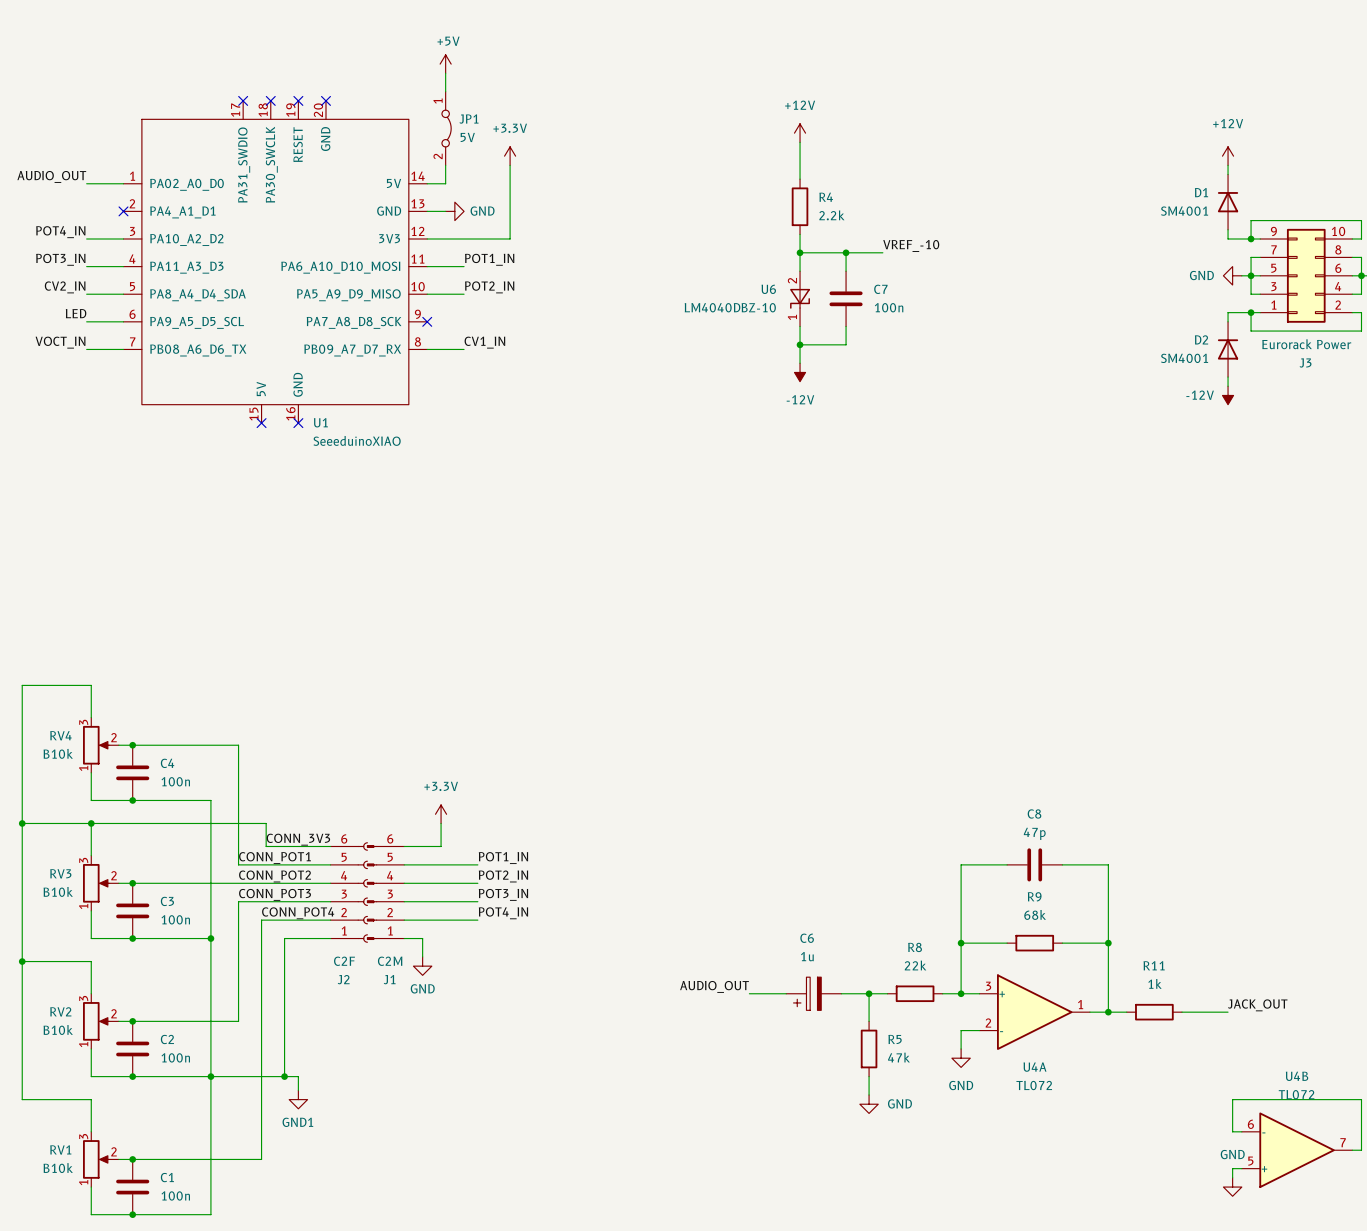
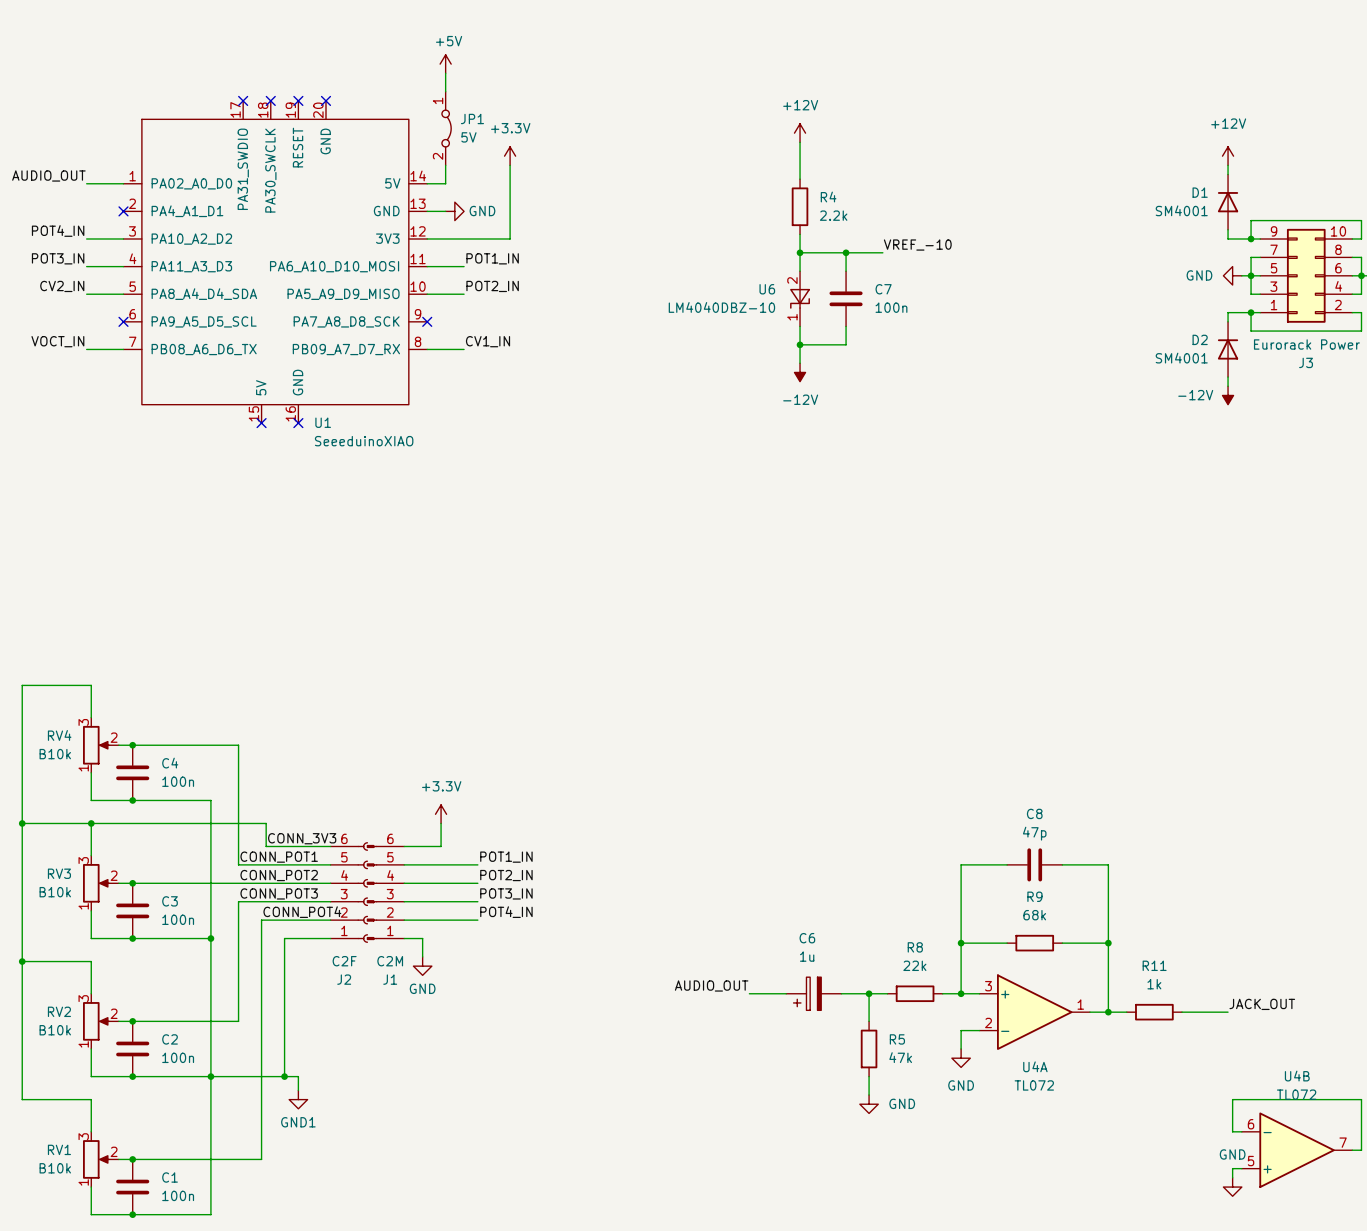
label: LED (76, 313) -> none
wire: (86, 321) (123, 321) -> none
no-connect mark: none -> (123, 321)

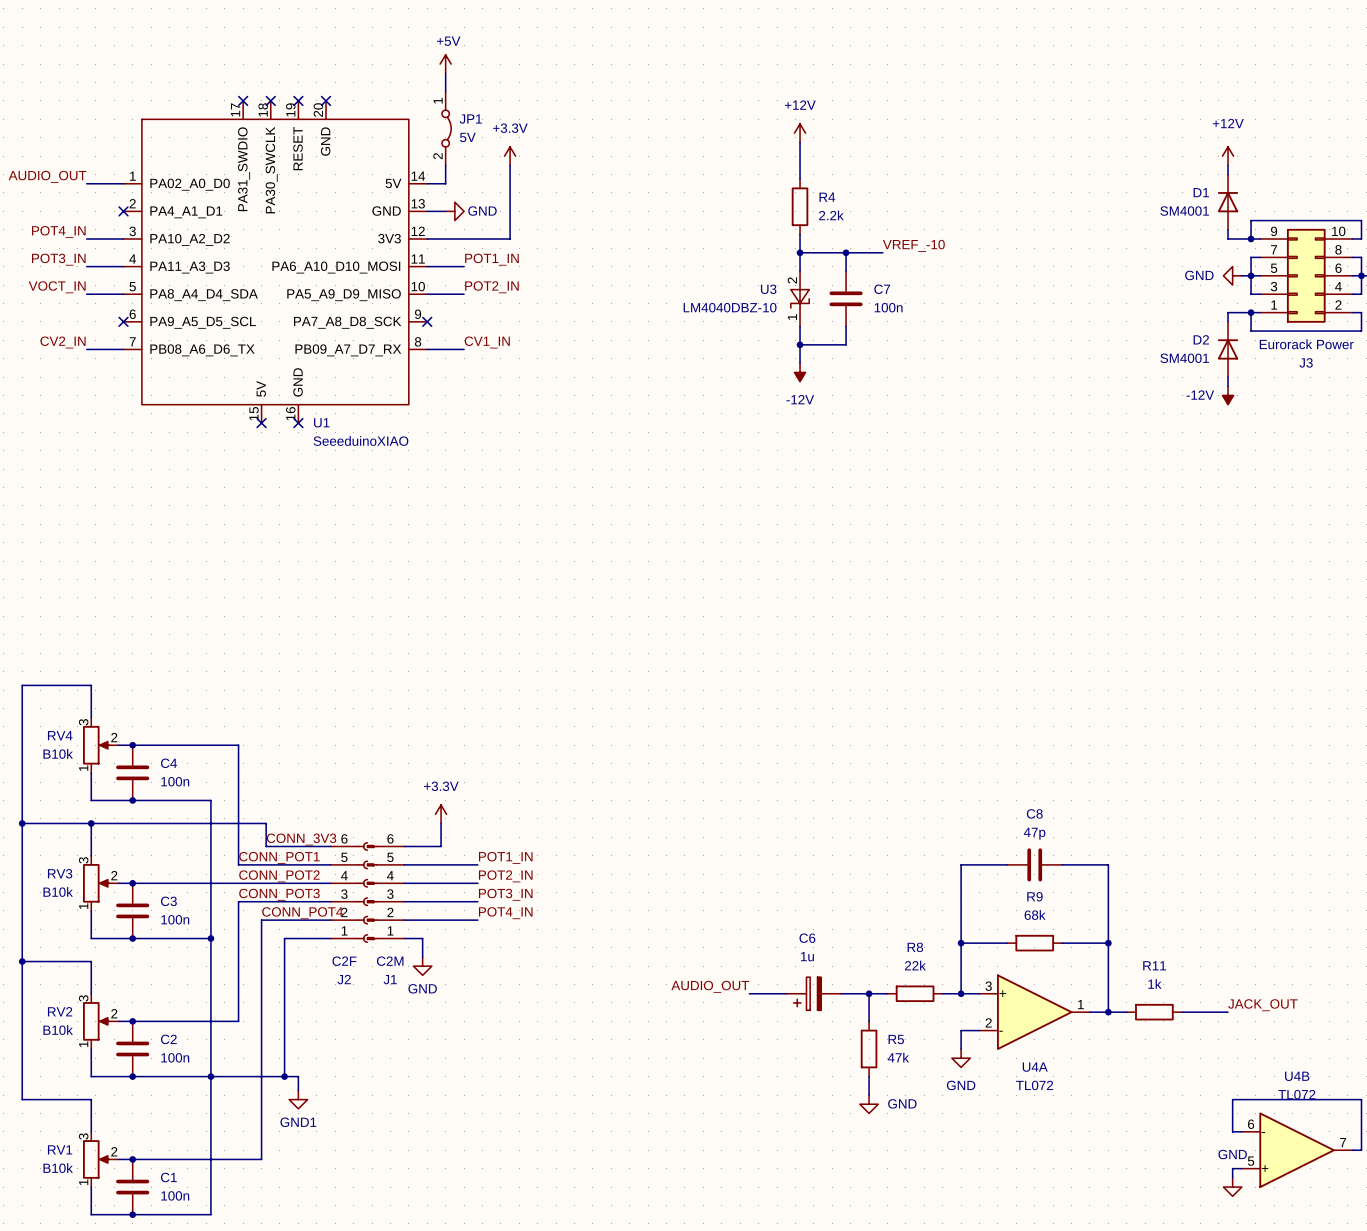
label: CV2_IN (62, 286) -> VOCT_IN (57, 287)
U6 name: U6 (767, 289) -> U3 (768, 289)
label: VOCT_IN (57, 341) -> CV2_IN (63, 342)

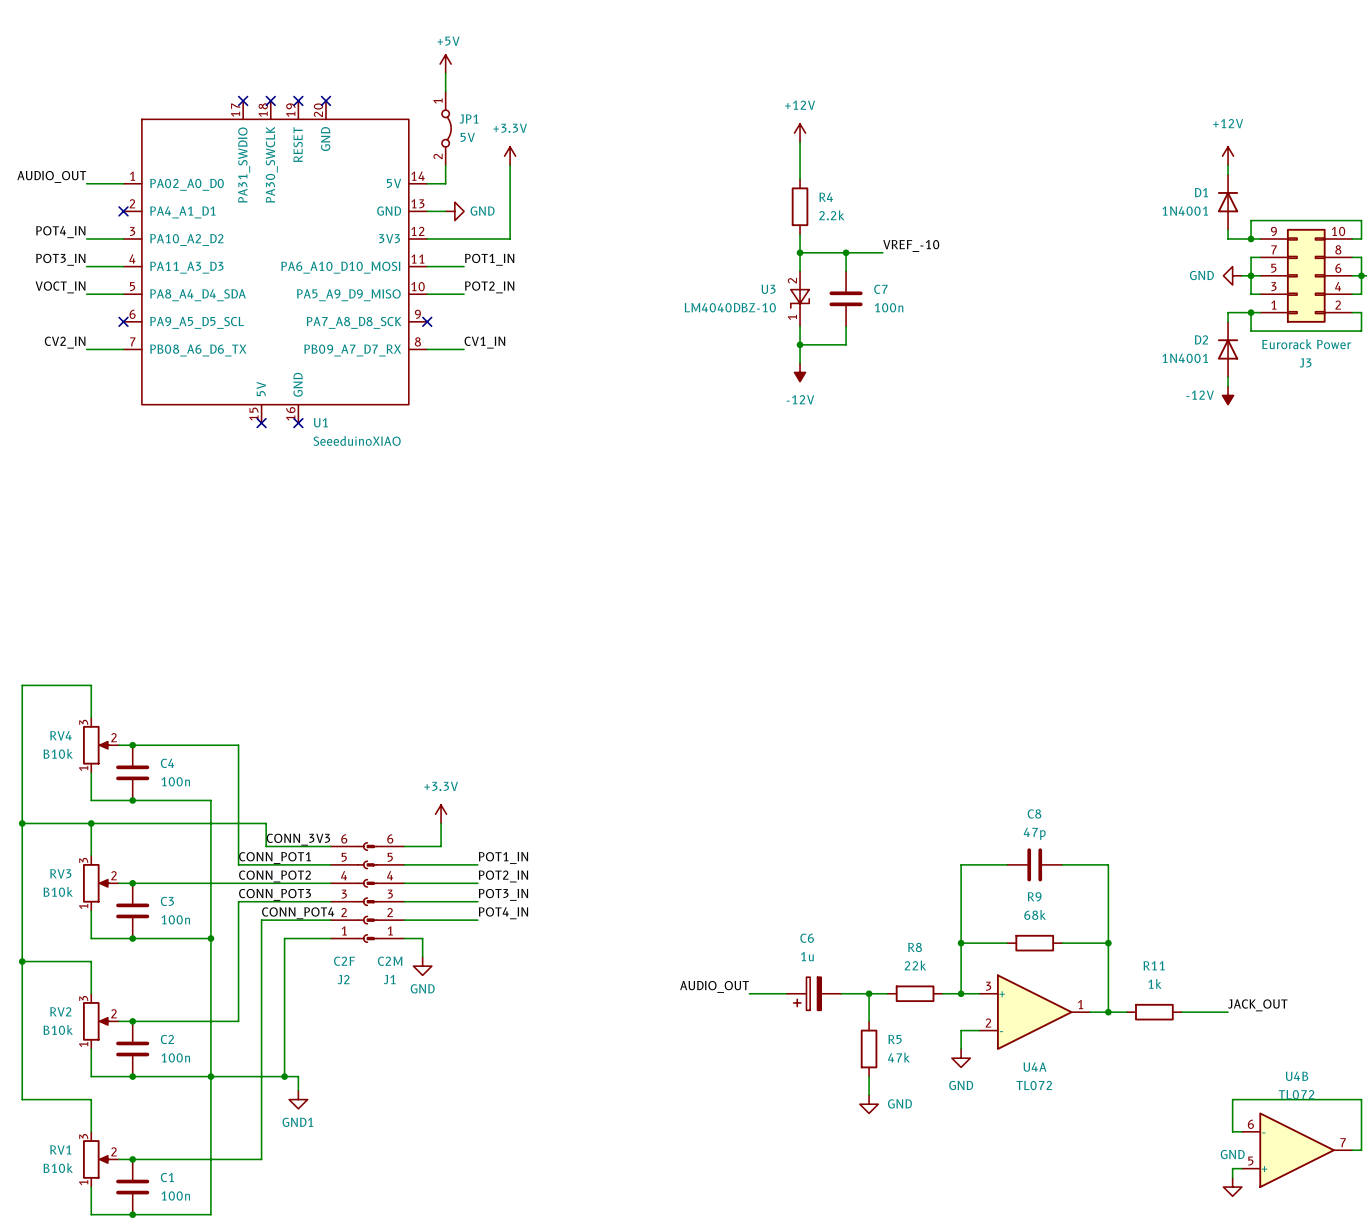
D1 value: SM4001 (1184, 211) -> 1N4001 (1185, 211)
D2 value: SM4001 (1184, 358) -> 1N4001 (1185, 358)

